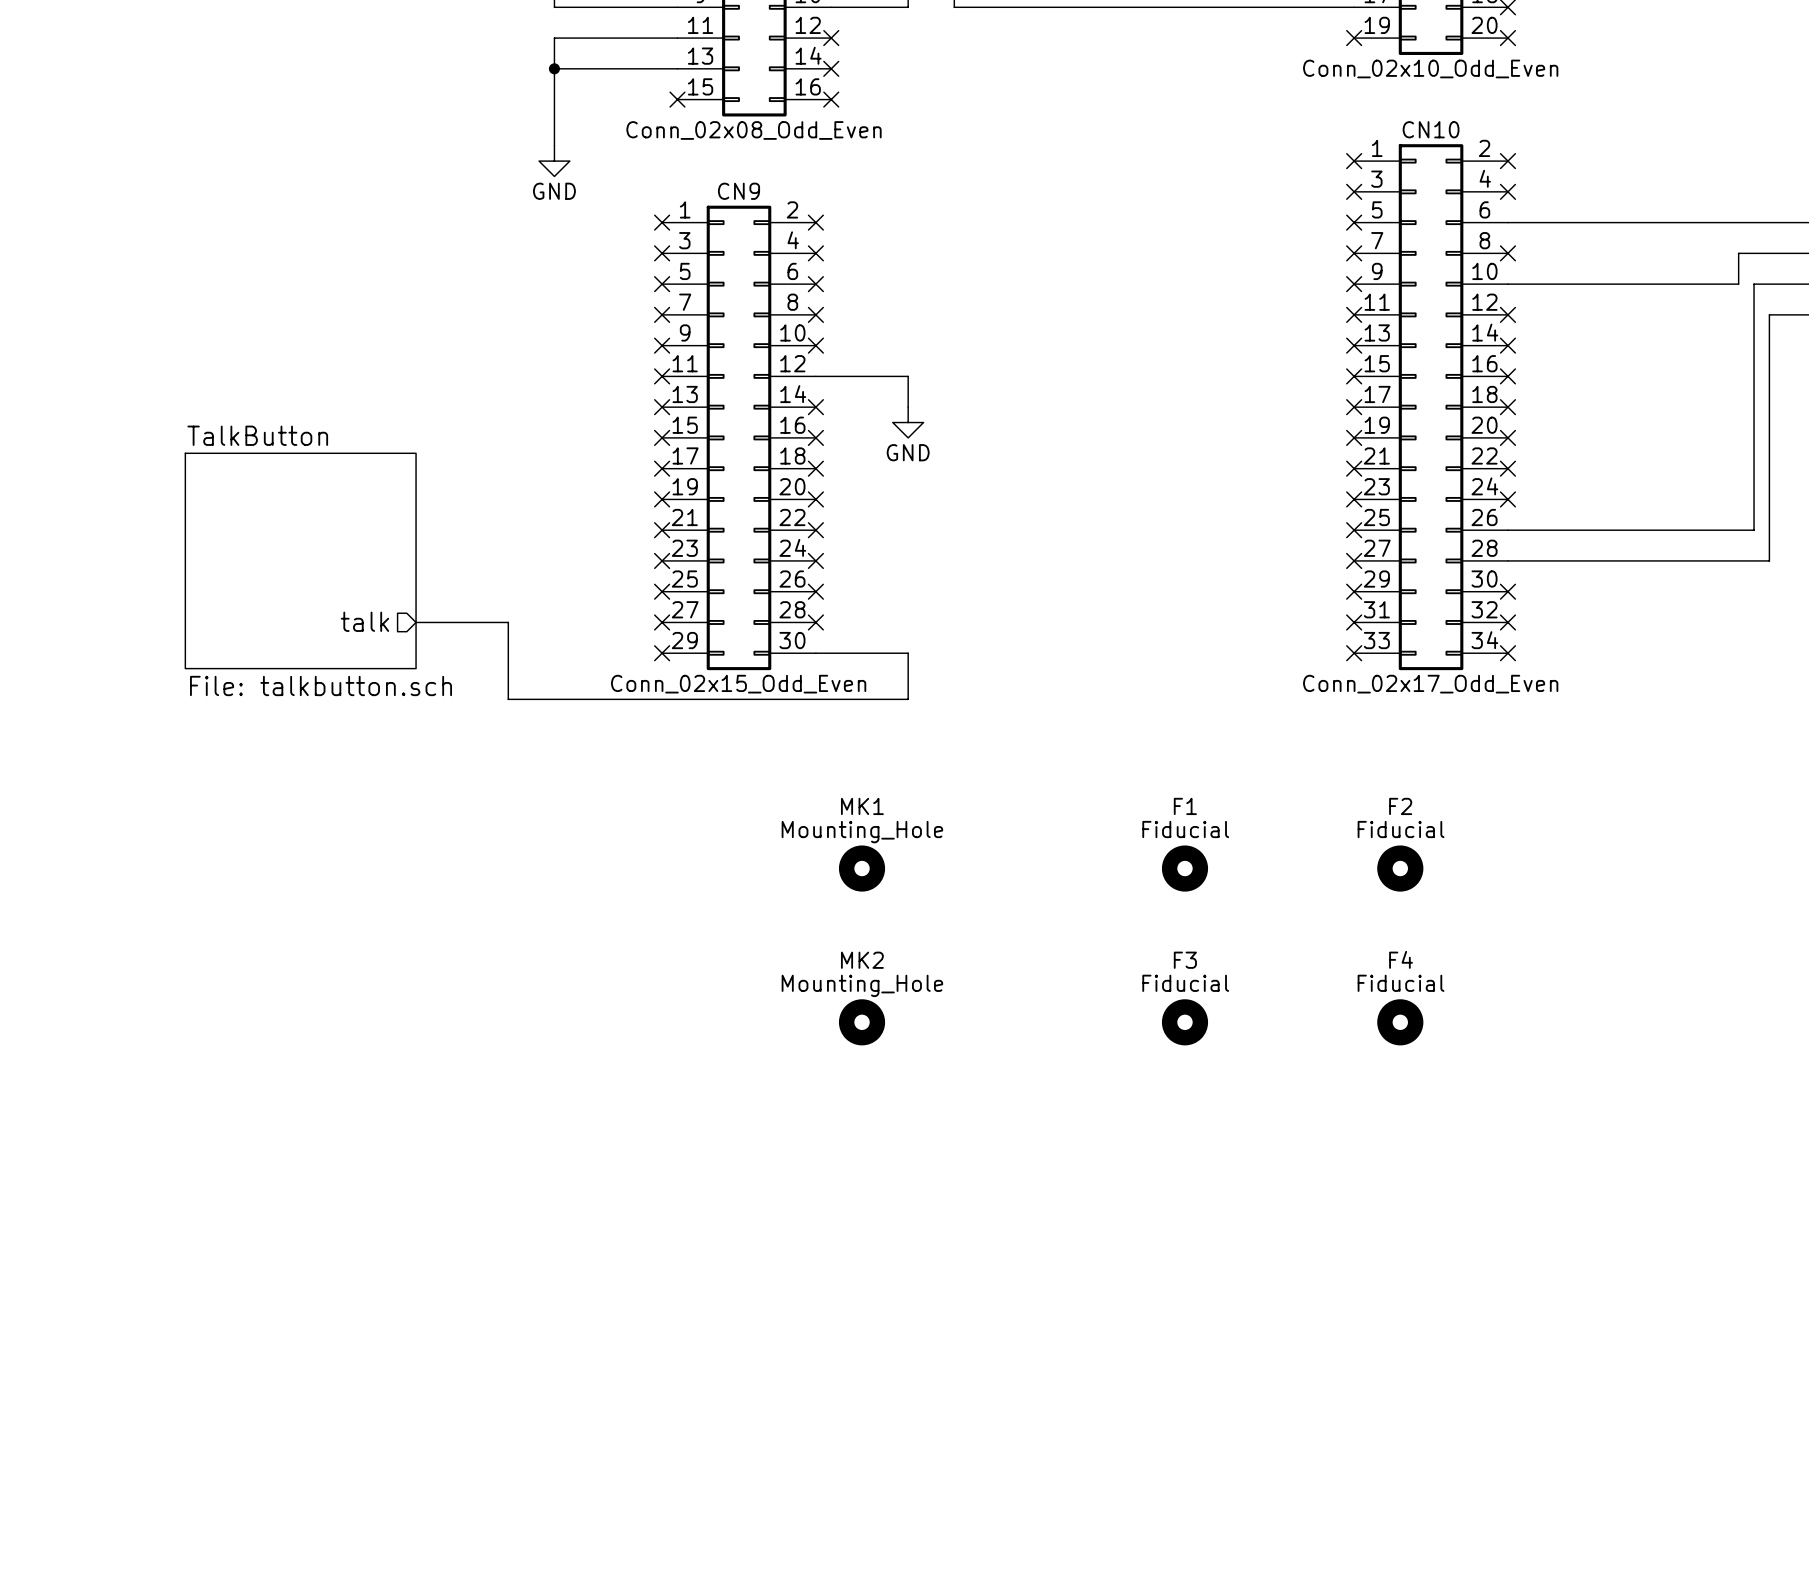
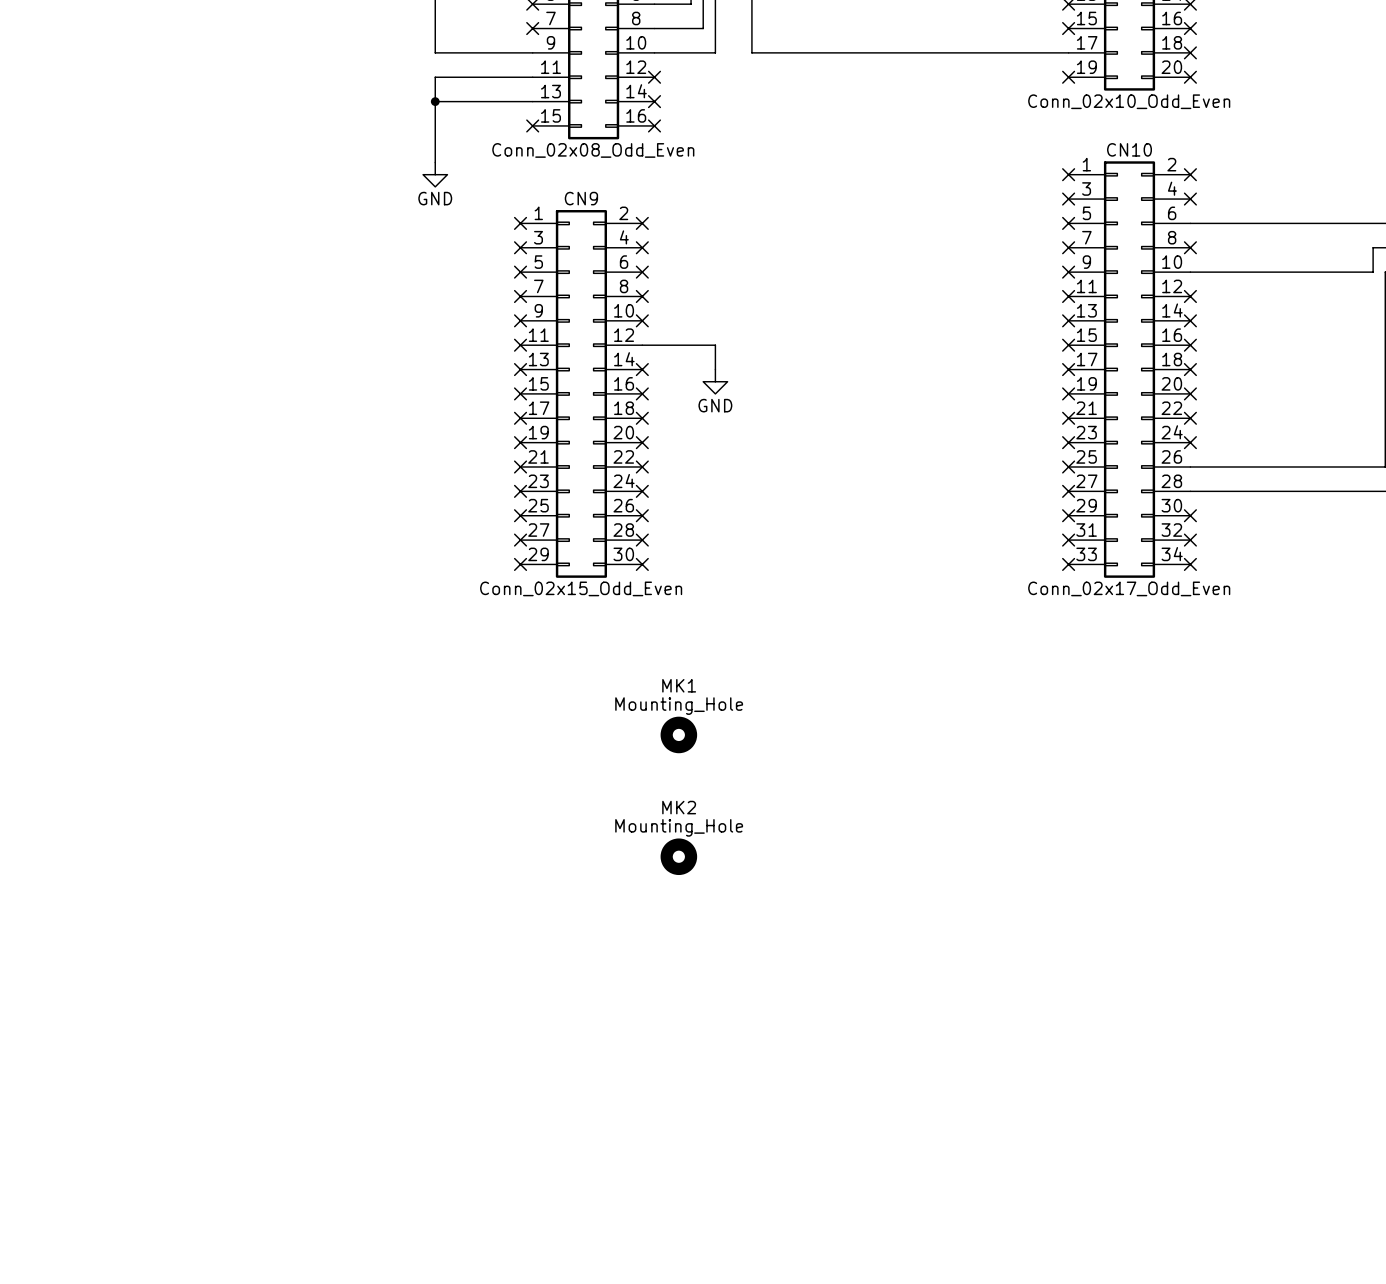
sheet TalkButton: File: talkbutton.sch (300, 560) -> none
sheet pin: talk (364, 621) -> none
wire: (416, 622) (508, 622) (508, 699) (908, 699) (908, 653) (815, 653) -> none
no-connect mark: none -> (642, 564)
F1: Fiducial (1184, 868) -> none
F2: Fiducial (1400, 868) -> none
F3: Fiducial (1184, 1022) -> none
F4: Fiducial (1400, 1022) -> none

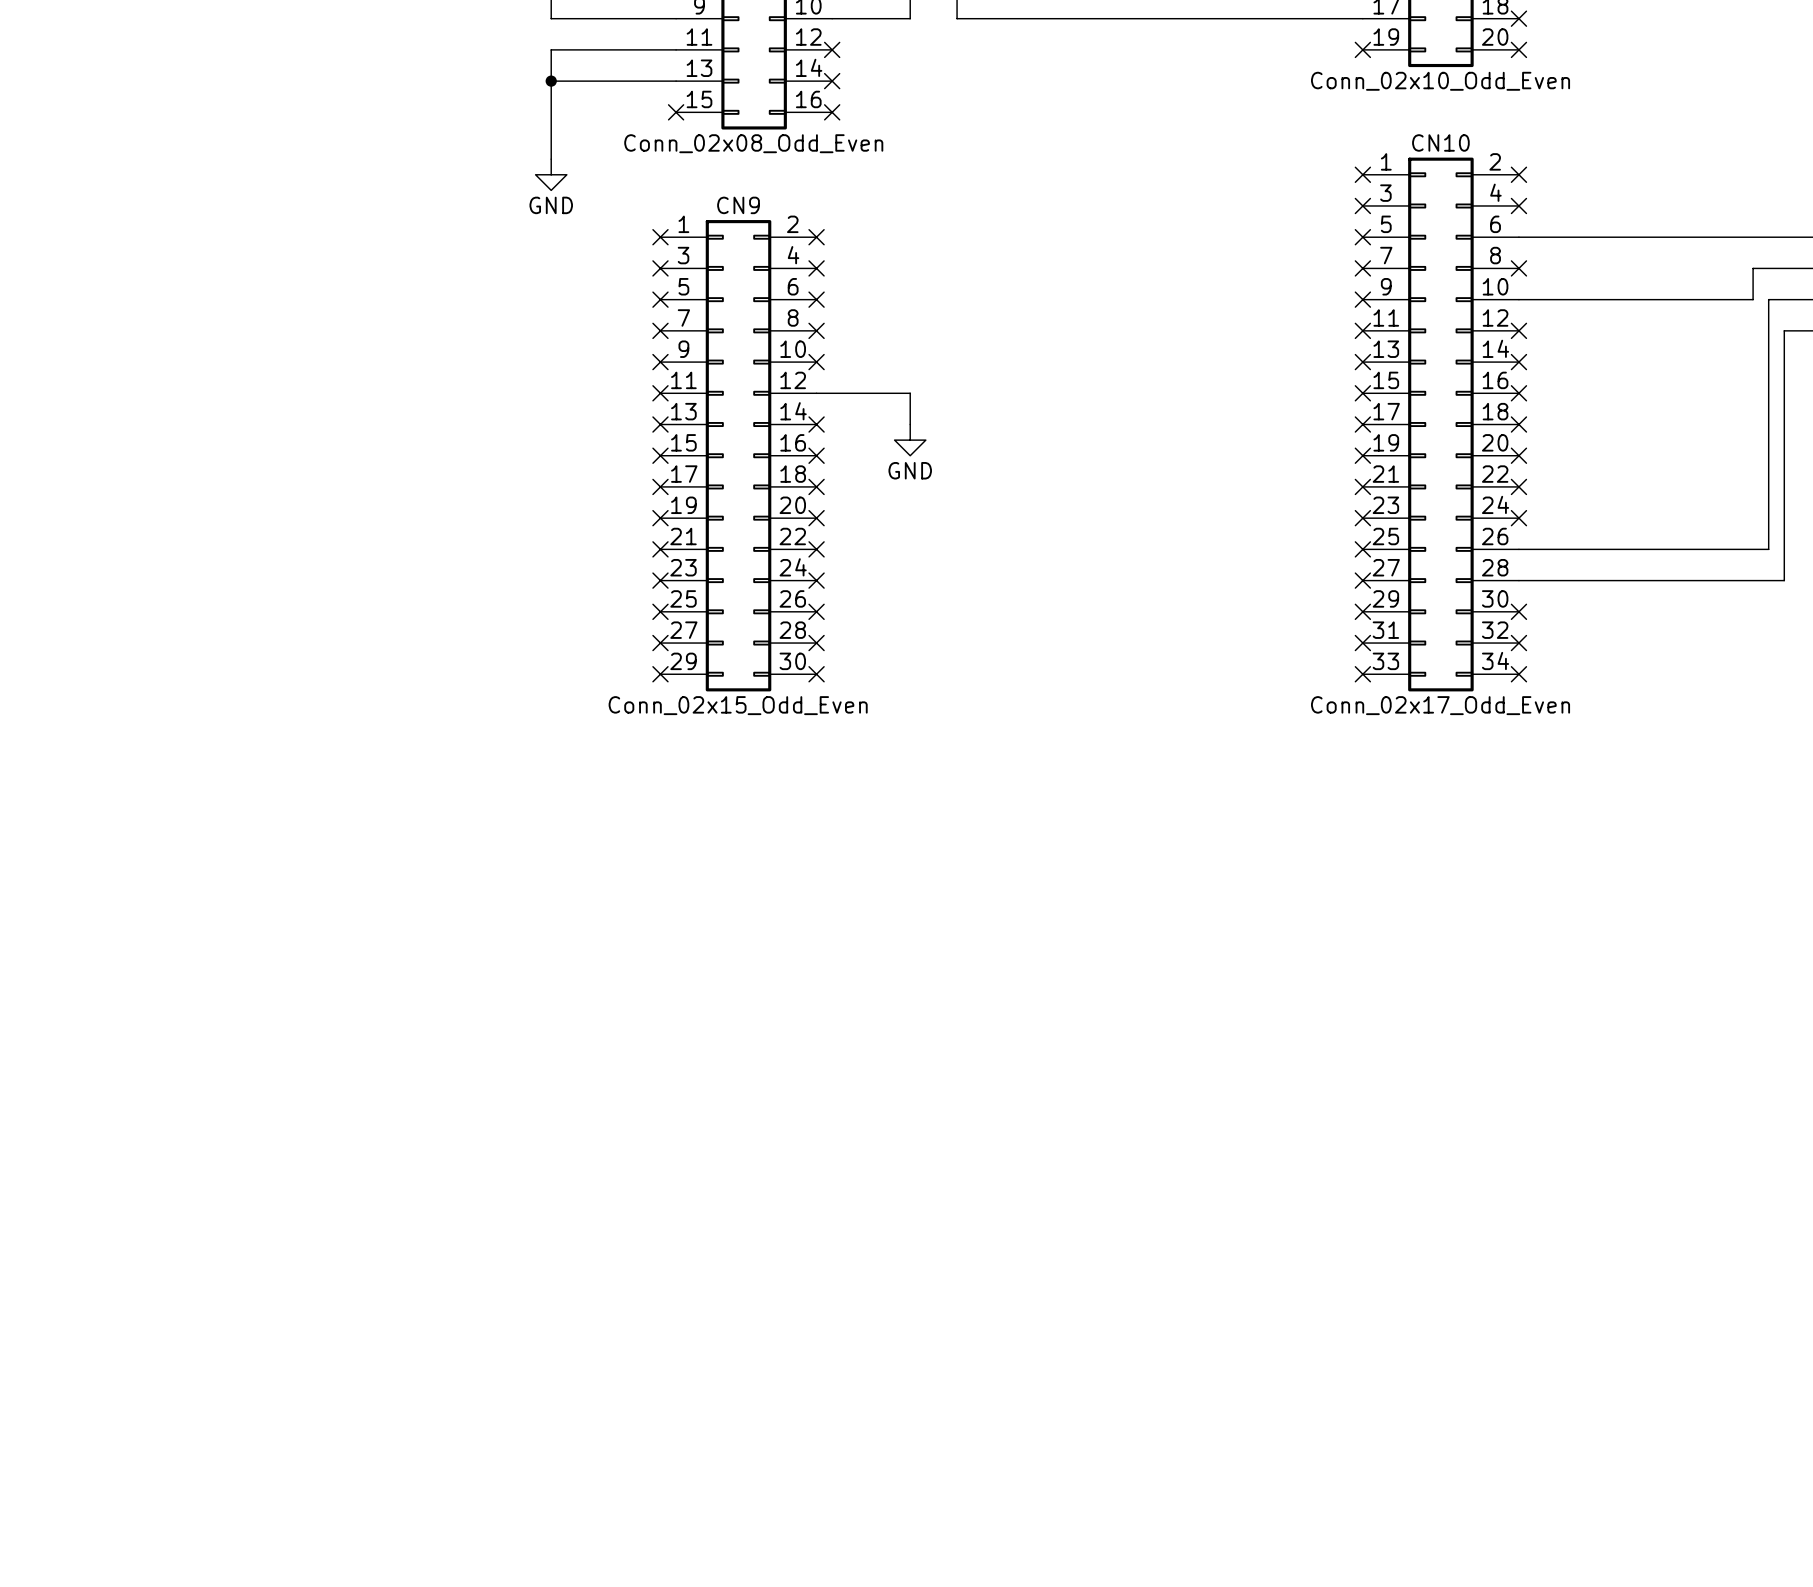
MK1: Mounting_Hole (678, 734) -> none
MK2: Mounting_Hole (678, 856) -> none

